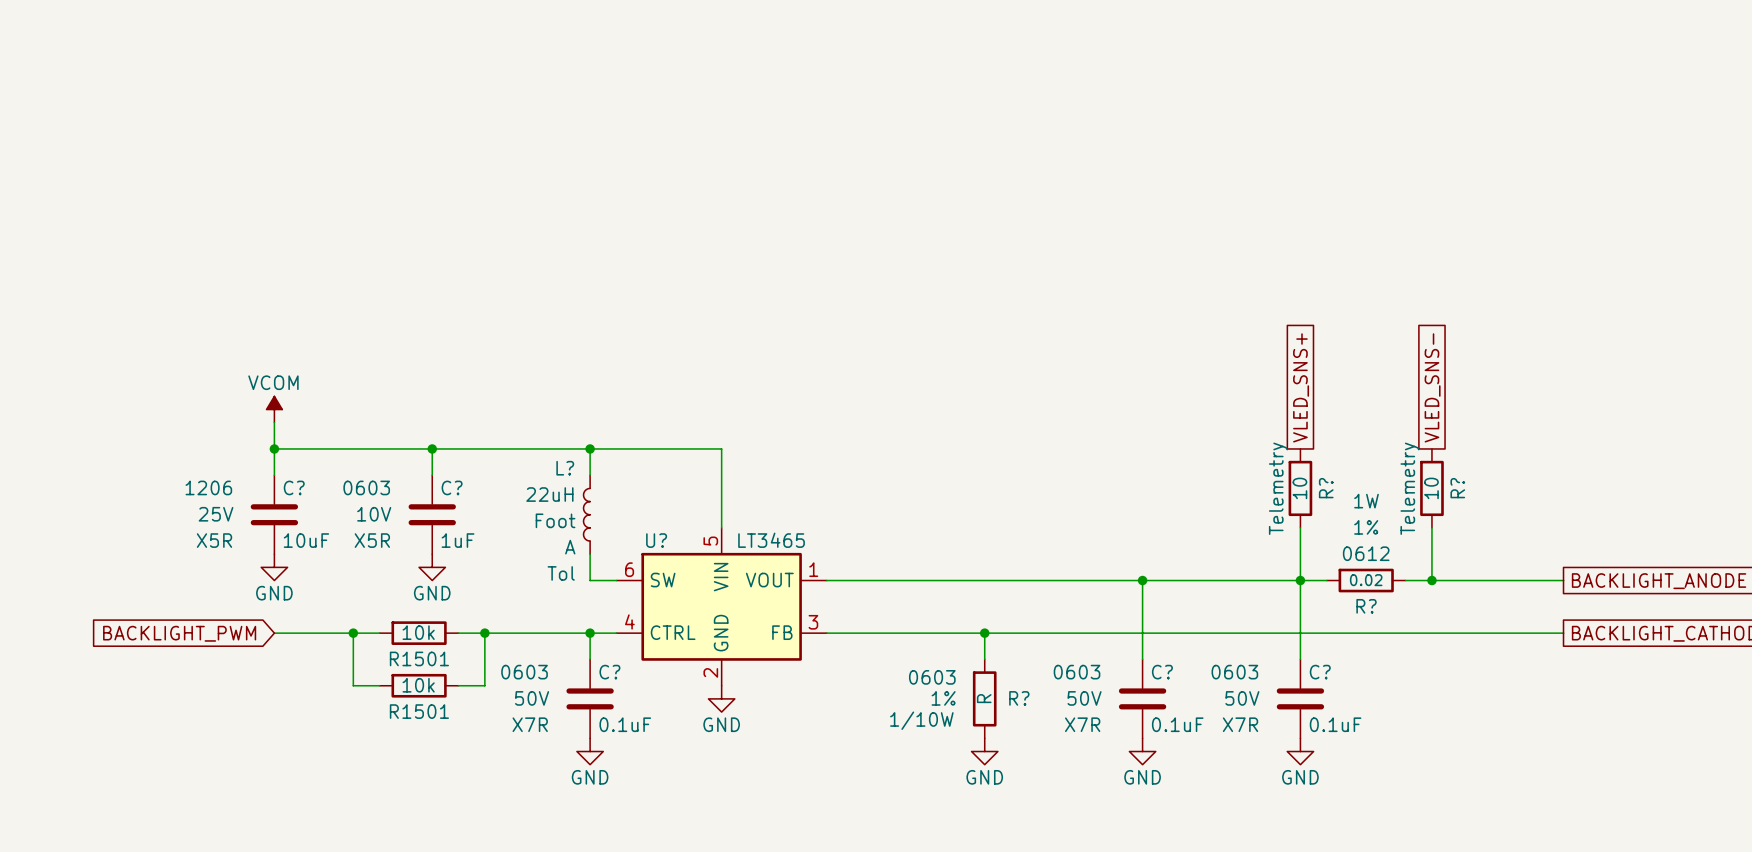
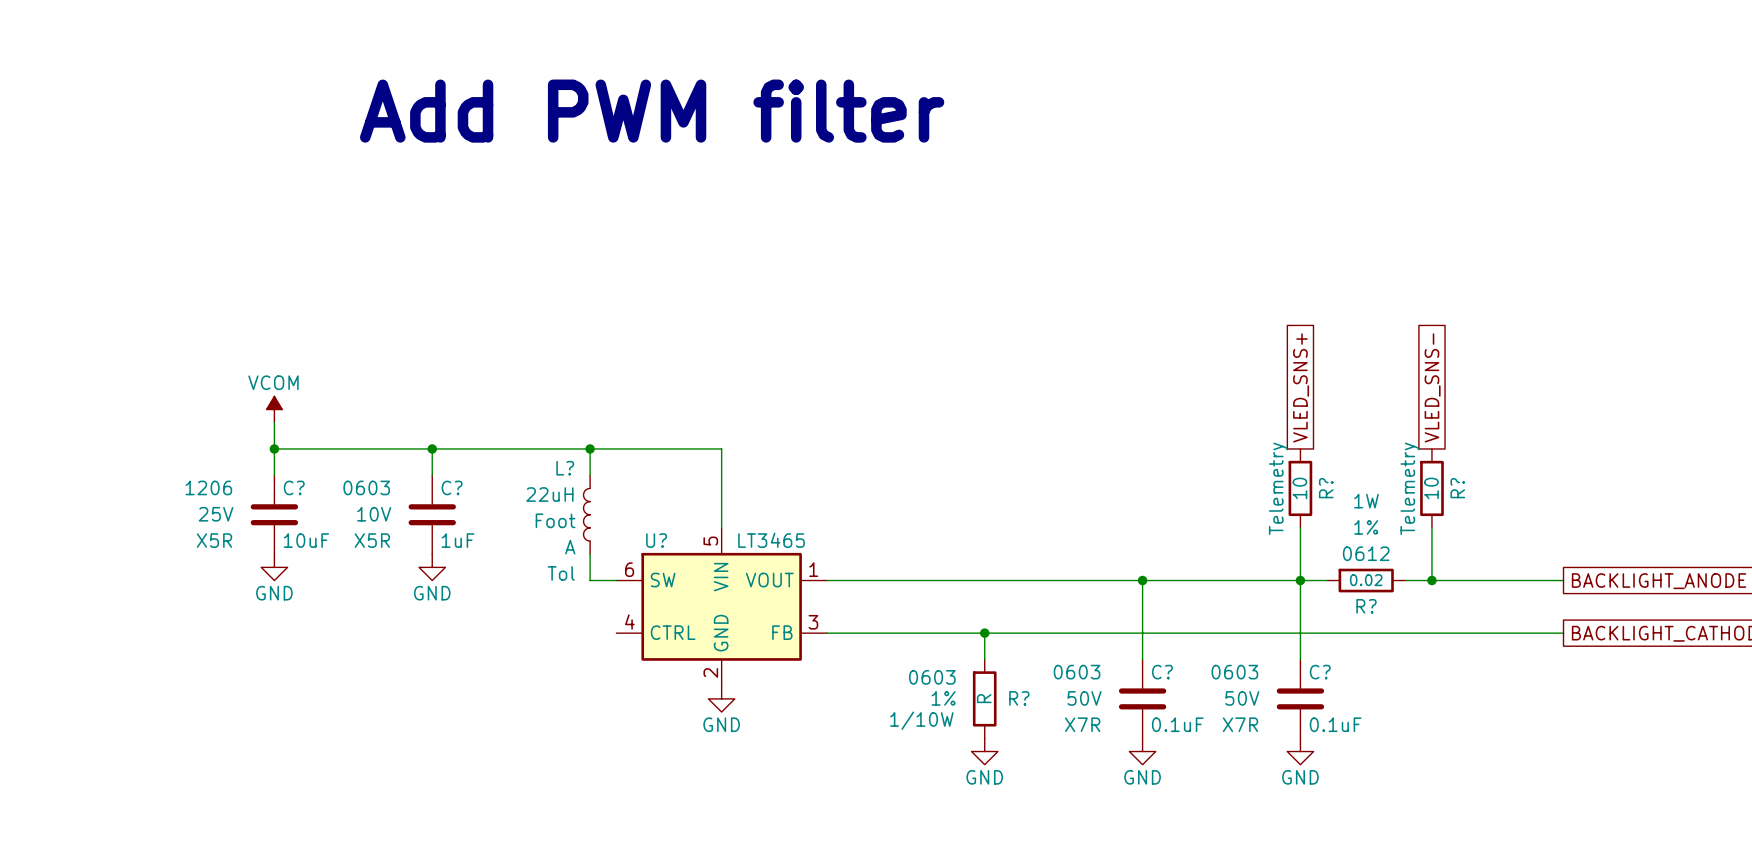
text: none -> Add PWM filter (652, 111)
global label: BACKLIGHT_PWM (179, 633) -> none
wire: (274, 633) (379, 633) -> none
wire: (353, 633) (353, 685) (379, 685) -> none
junction: (353, 633) -> none
R1501: 10k (419, 633) -> none
wire: (458, 633) (616, 633) -> none
wire: (484, 633) (484, 685) (458, 685) -> none
junction: (484, 633) -> none
wire: (590, 633) (590, 659) -> none
junction: (590, 633) -> none
R1501: 10k (419, 685) -> none
C?: 0.1uF (590, 698) -> none
power symbol: GND (590, 751) -> none

